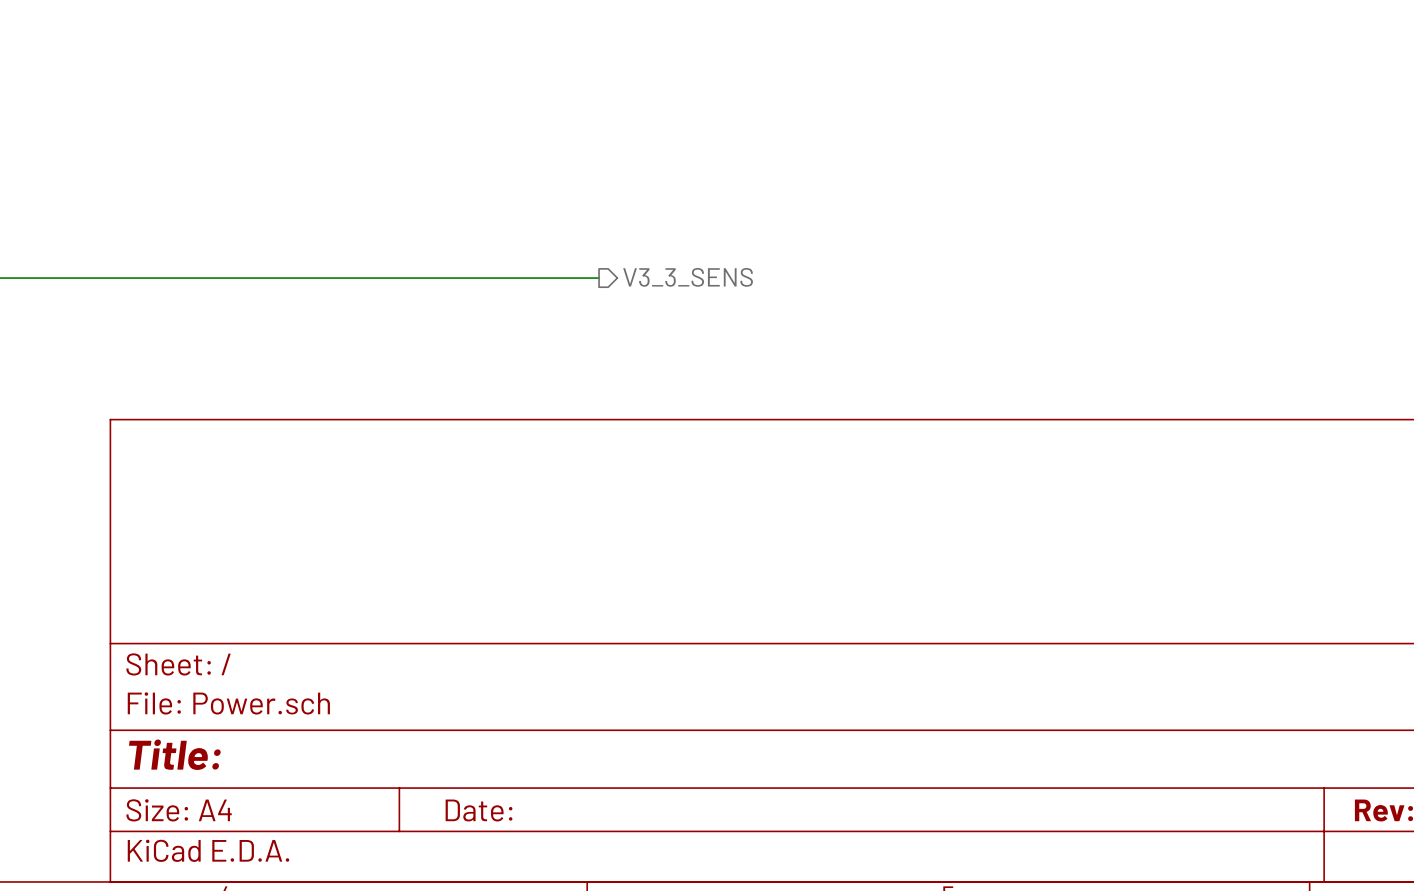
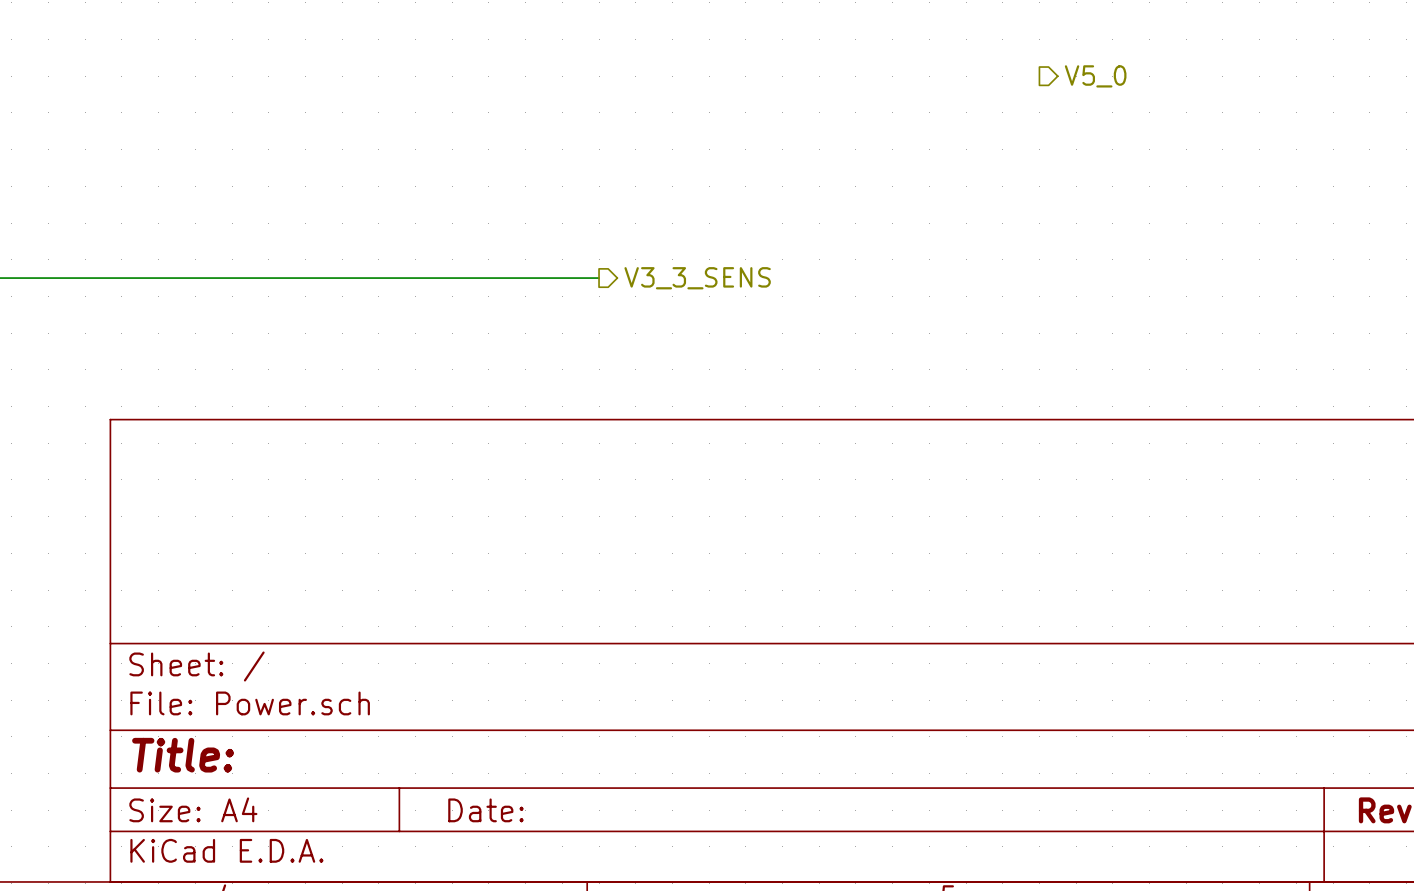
hierarchical label: none -> V5_0 (1095, 76)

